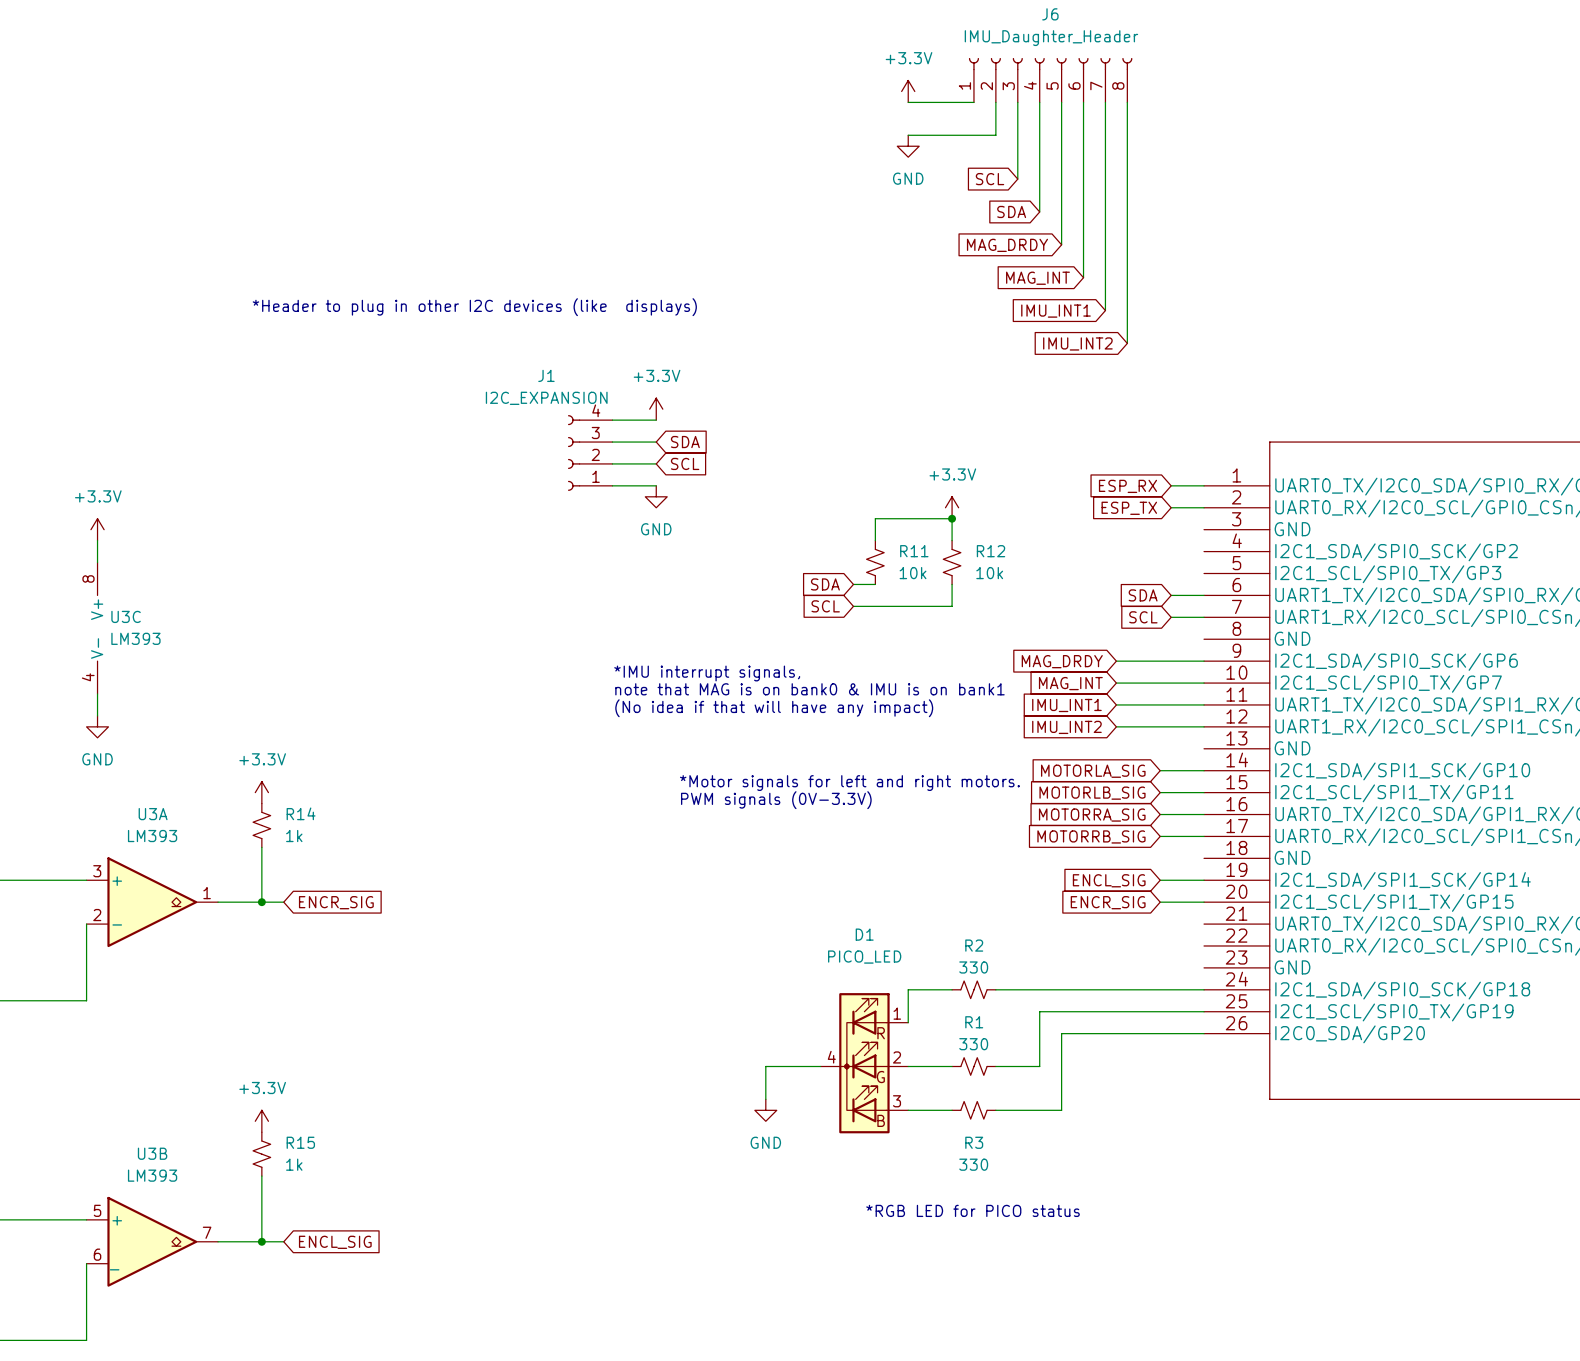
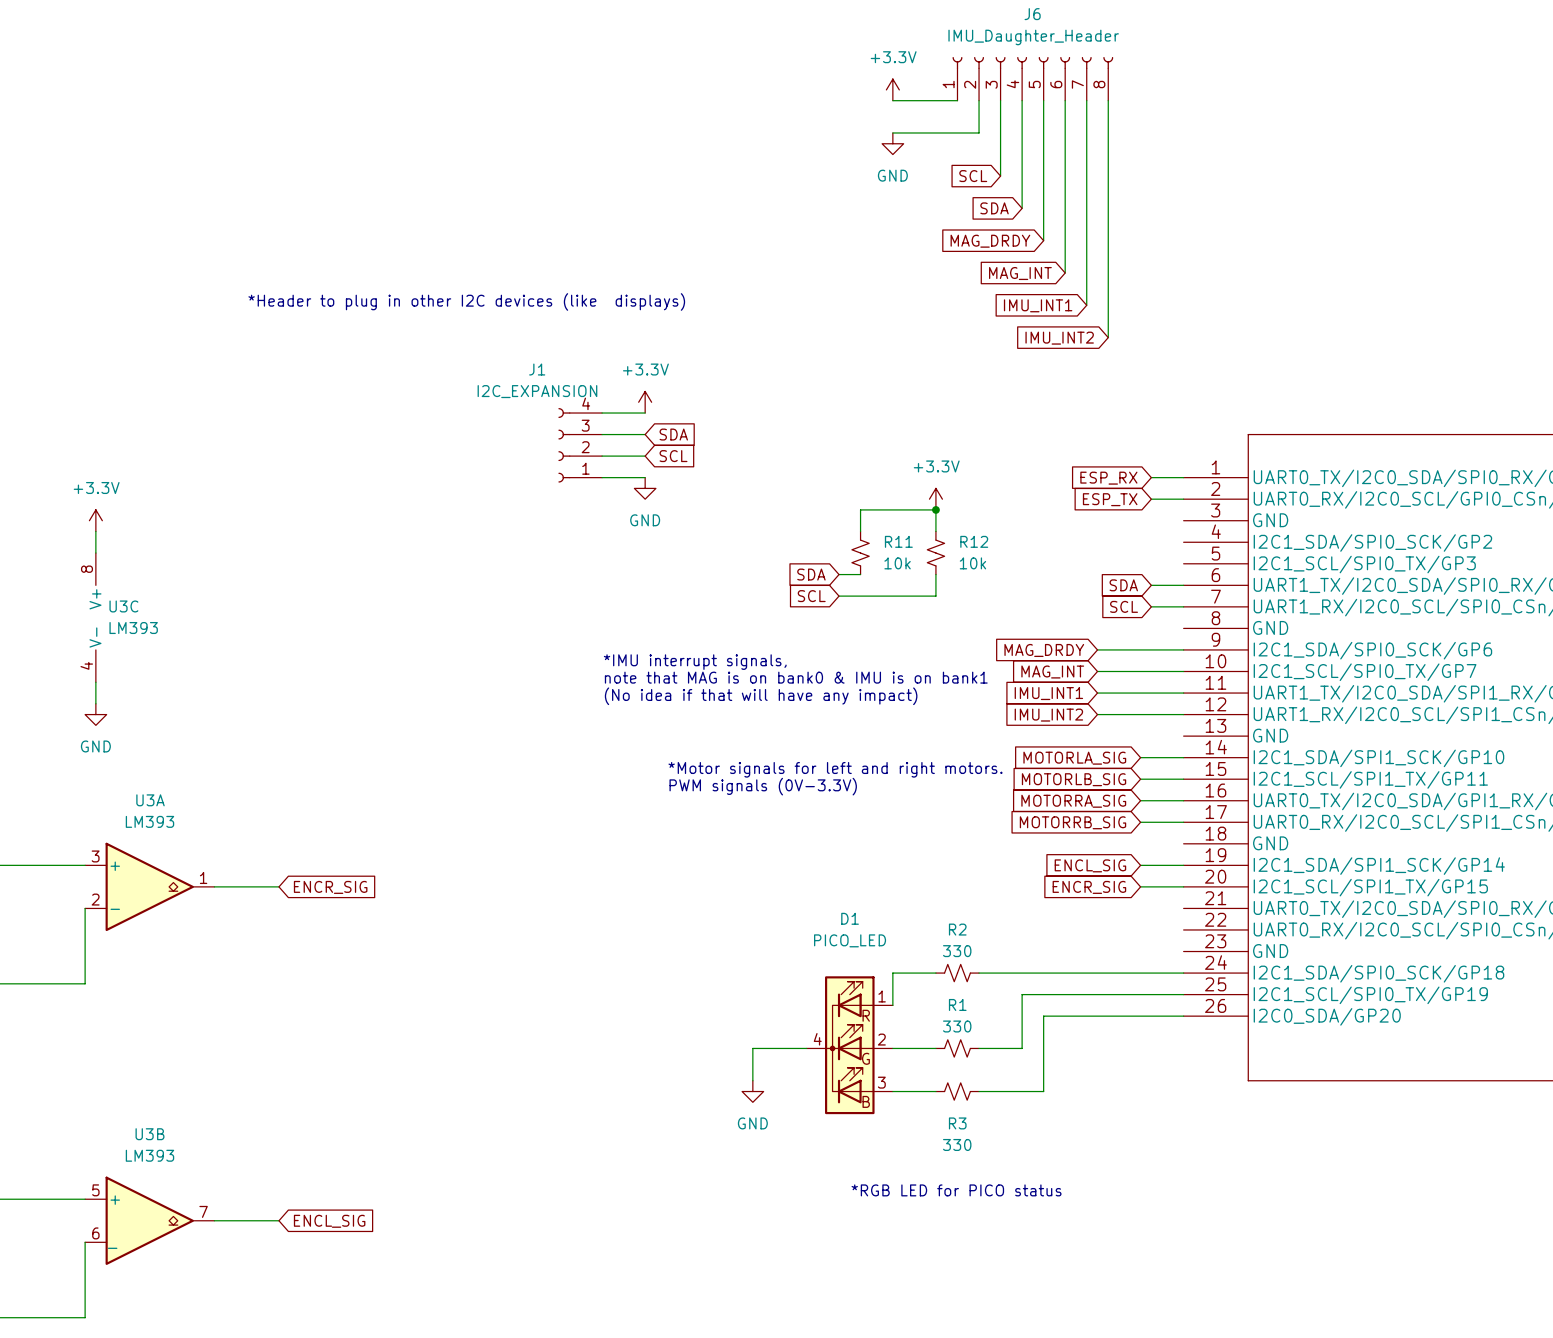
power symbol: +3.3V (261, 792) -> none
R14: 1k (261, 825) -> none
wire: (261, 847) (261, 902) -> none
junction: (261, 902) -> none
power symbol: +3.3V (261, 1121) -> none
R15: 1k (261, 1154) -> none
wire: (261, 1176) (261, 1241) -> none
junction: (261, 1241) -> none

